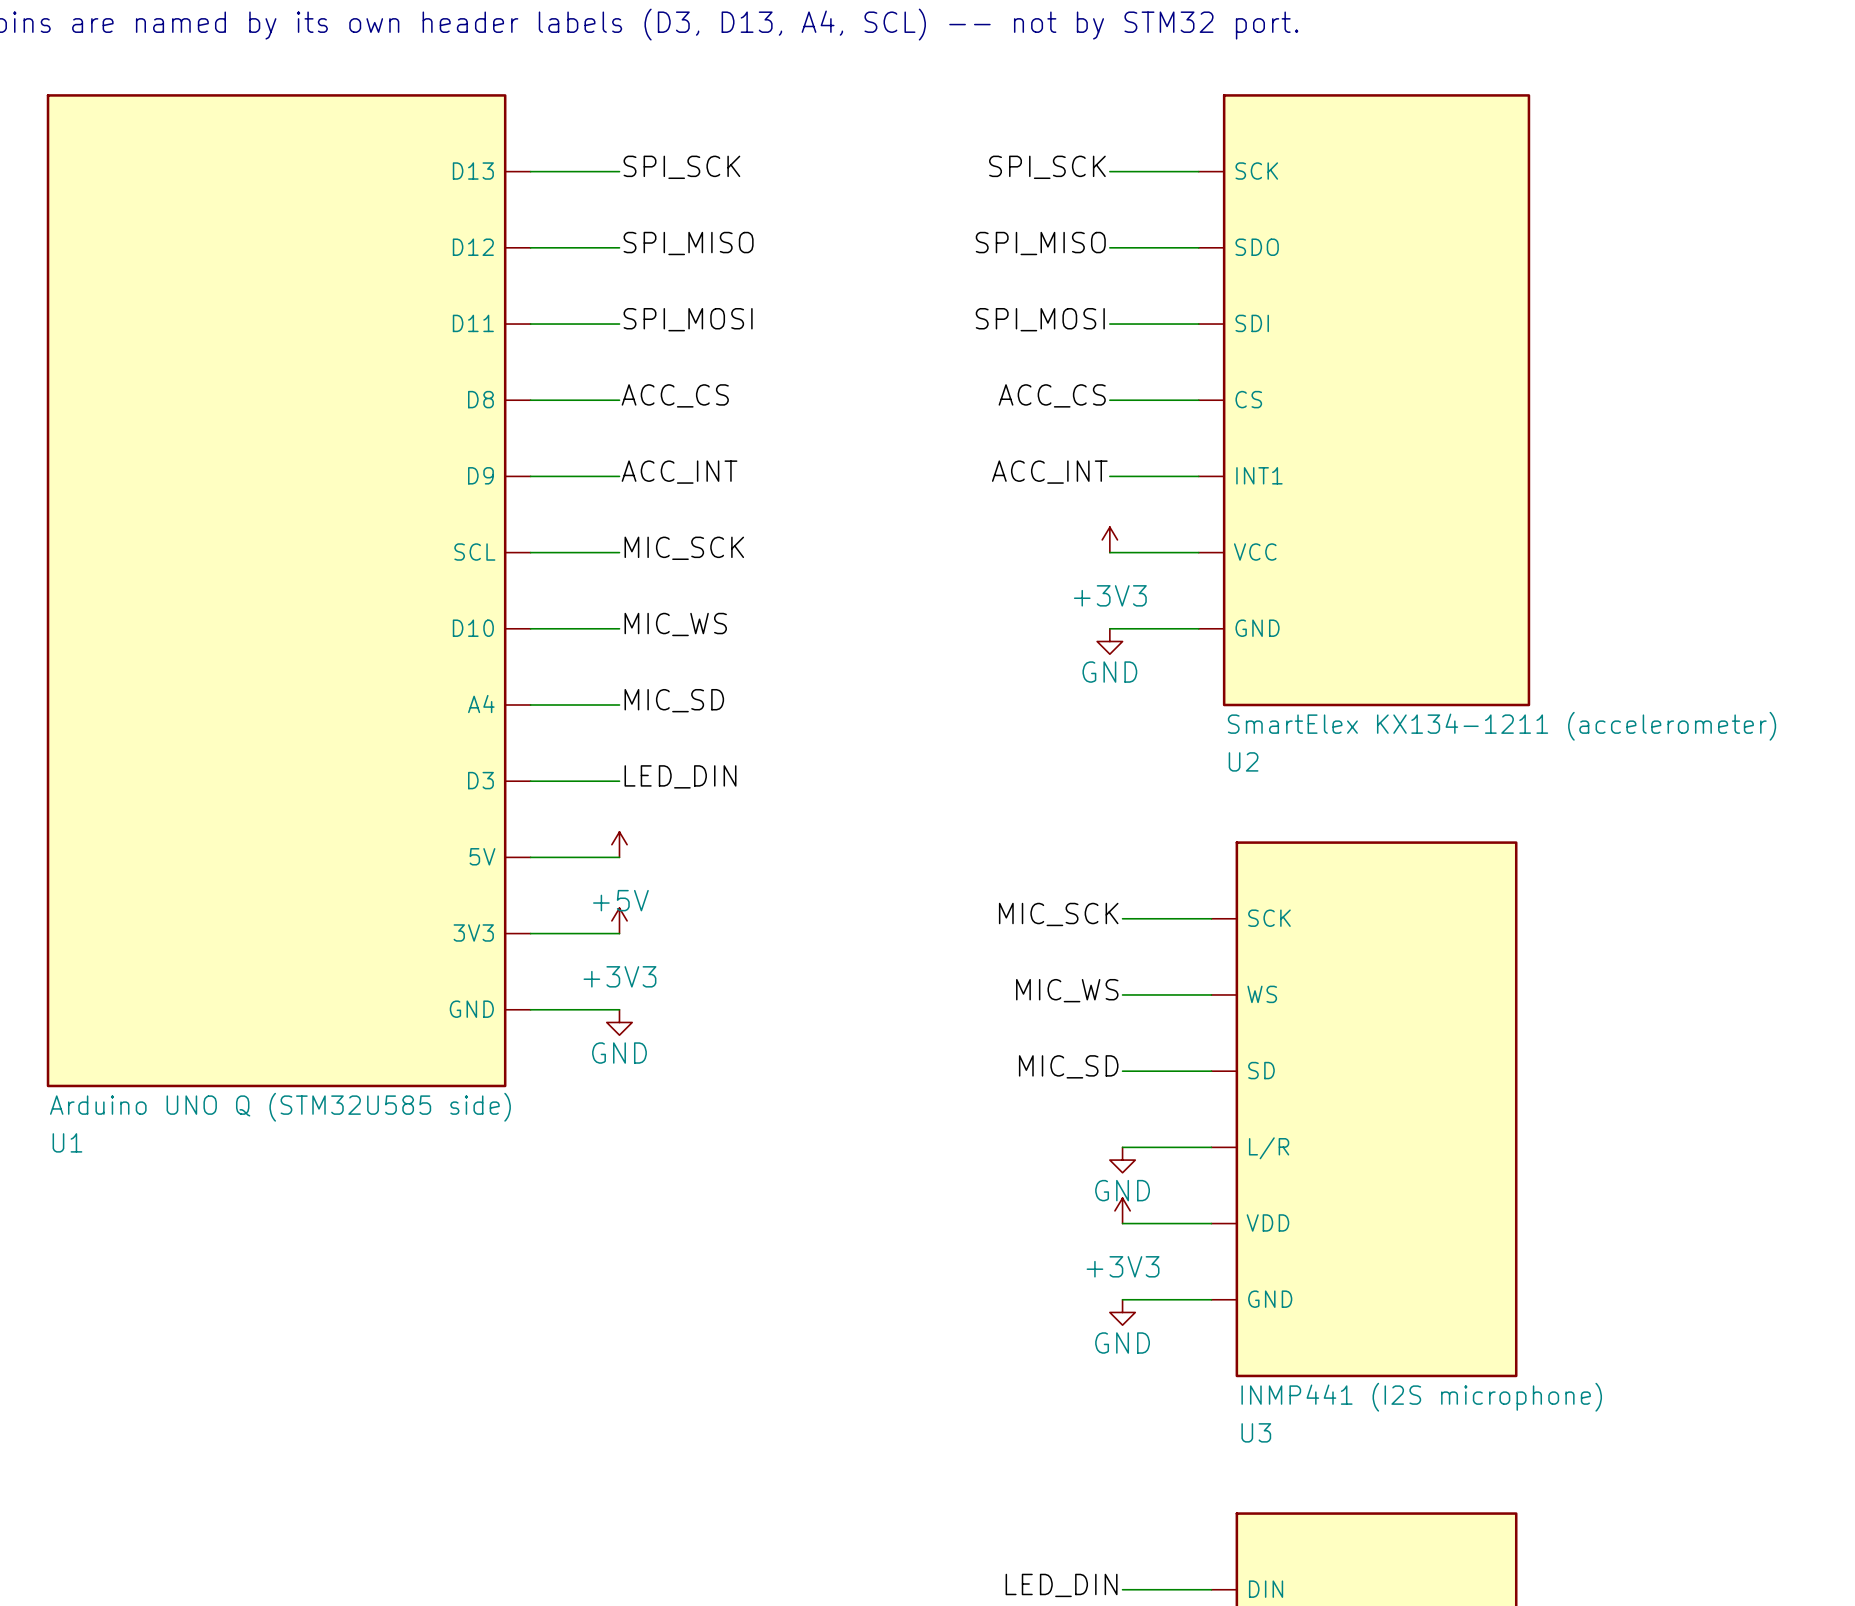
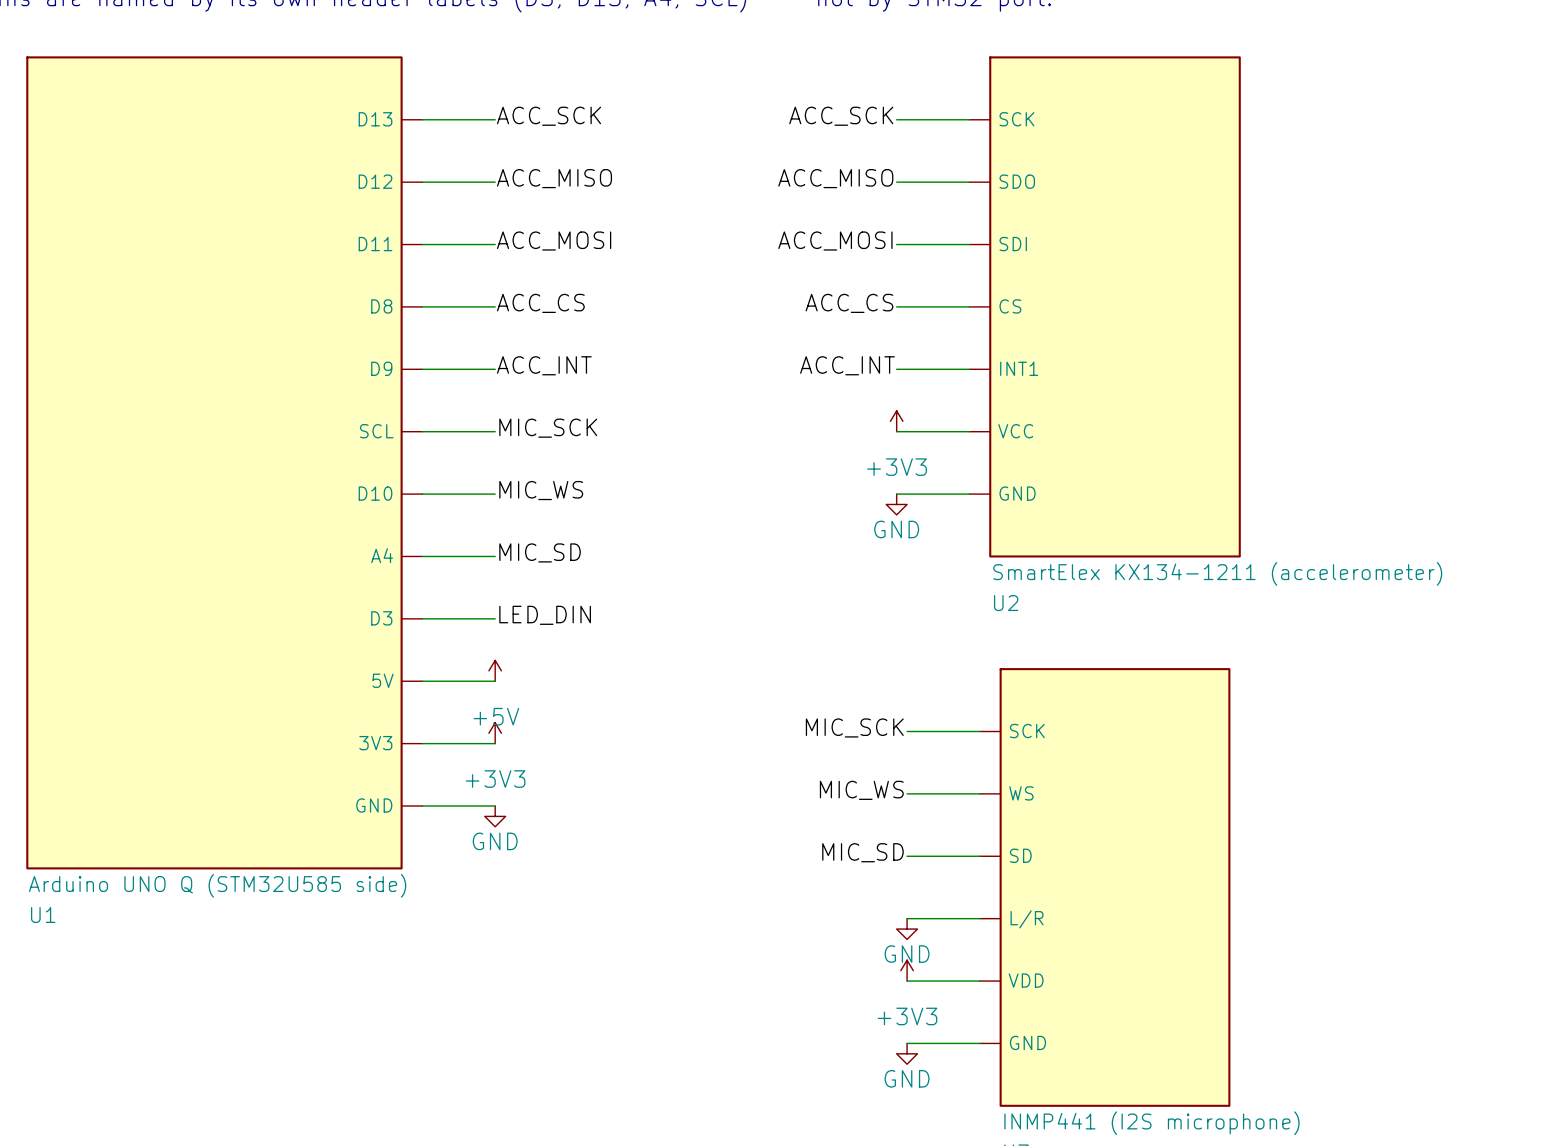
label: SPI_SCK (681, 167) -> ACC_SCK (549, 116)
label: SPI_SCK (1047, 167) -> ACC_SCK (841, 116)
label: SPI_MISO (688, 243) -> ACC_MISO (554, 178)
label: SPI_MISO (1040, 243) -> ACC_MISO (835, 178)
label: SPI_MOSI (688, 319) -> ACC_MOSI (554, 241)
label: SPI_MOSI (1040, 319) -> ACC_MOSI (835, 241)

